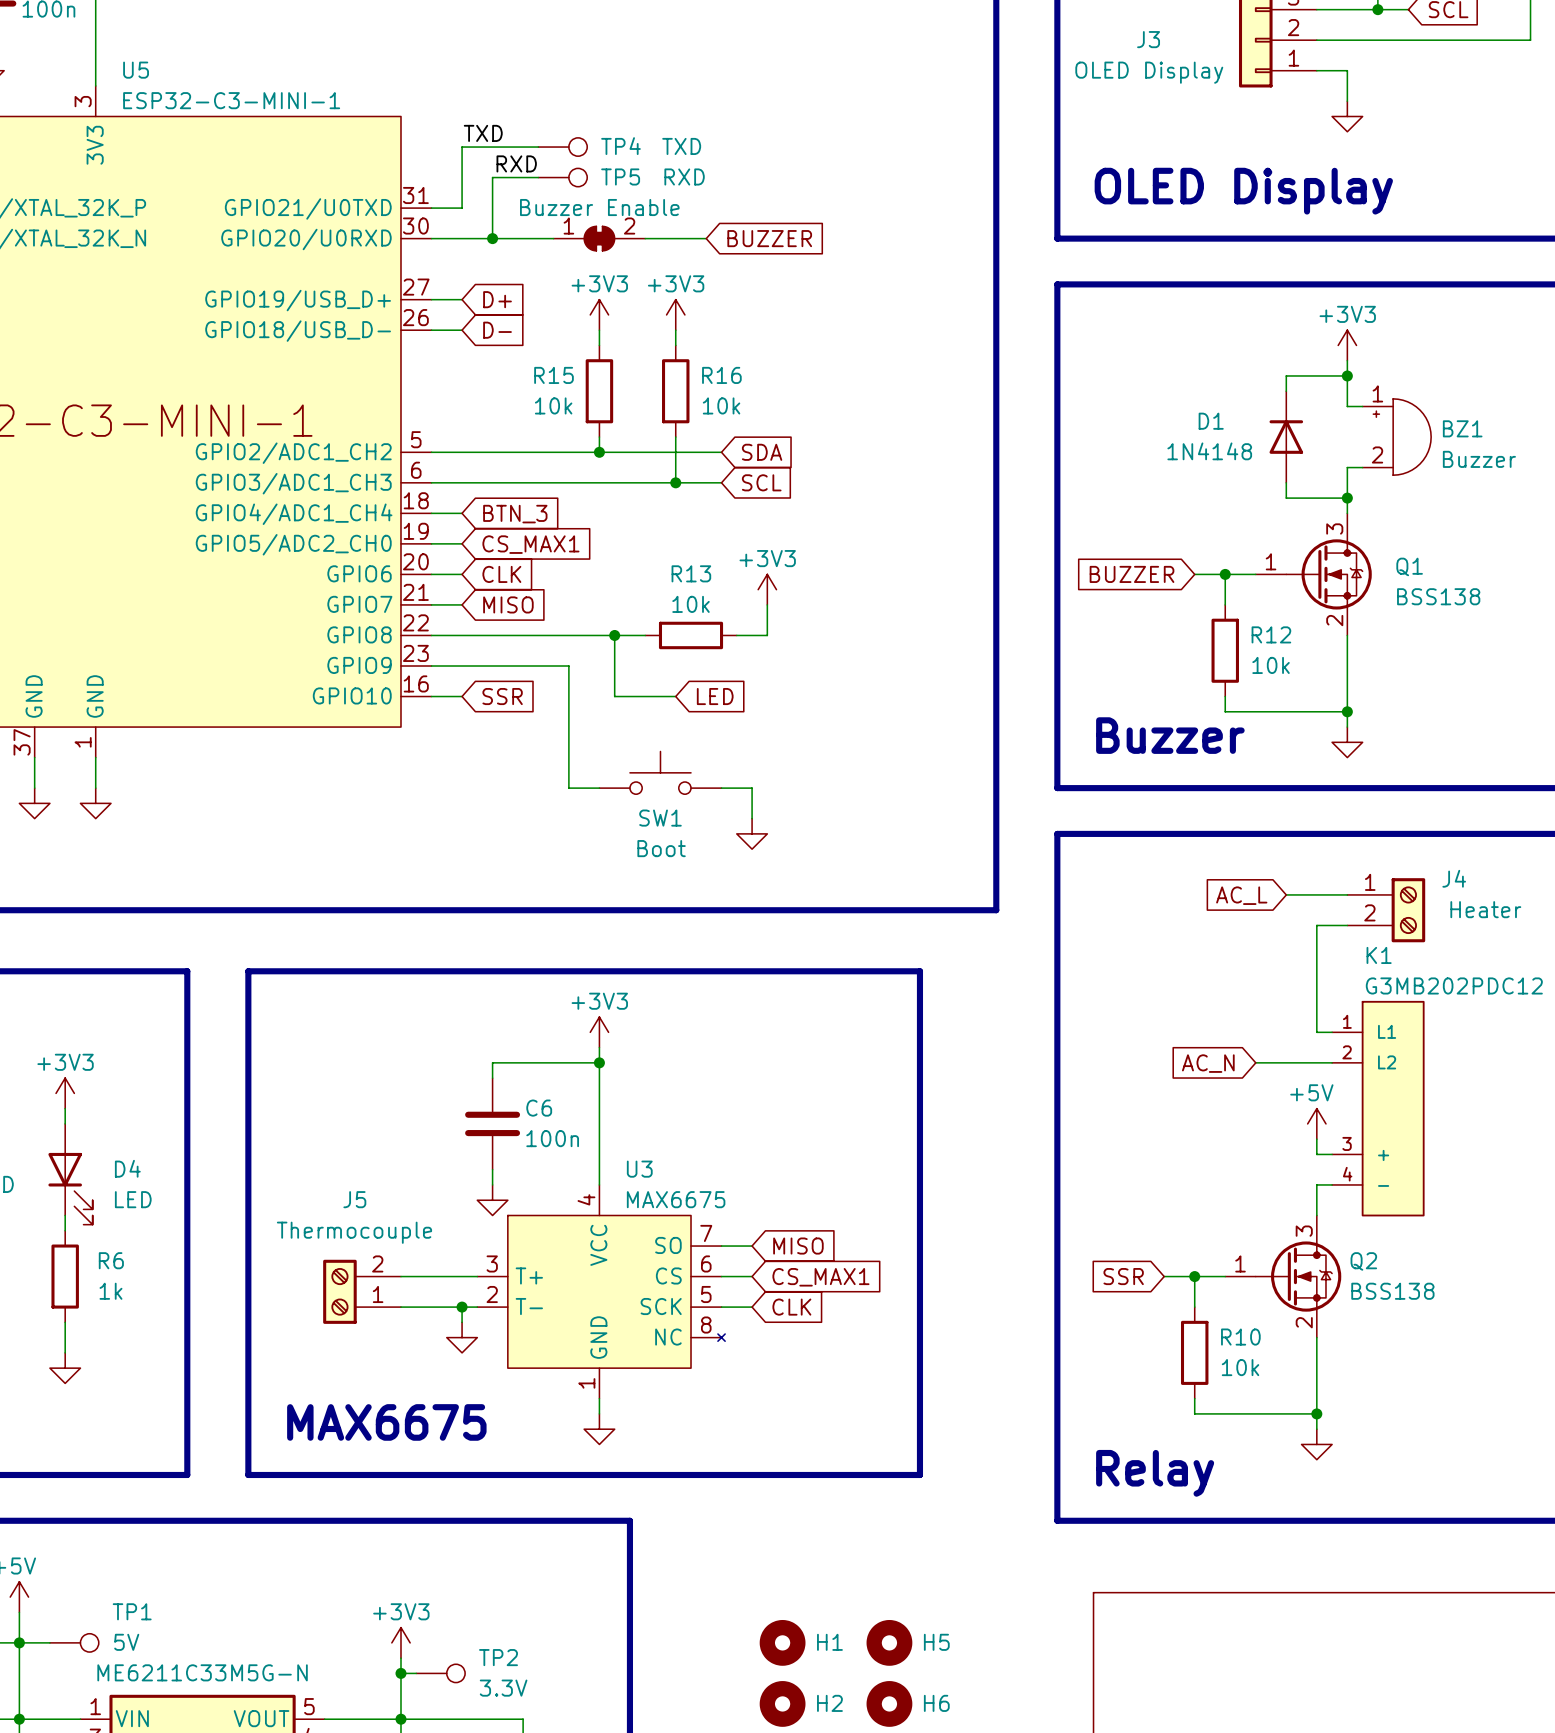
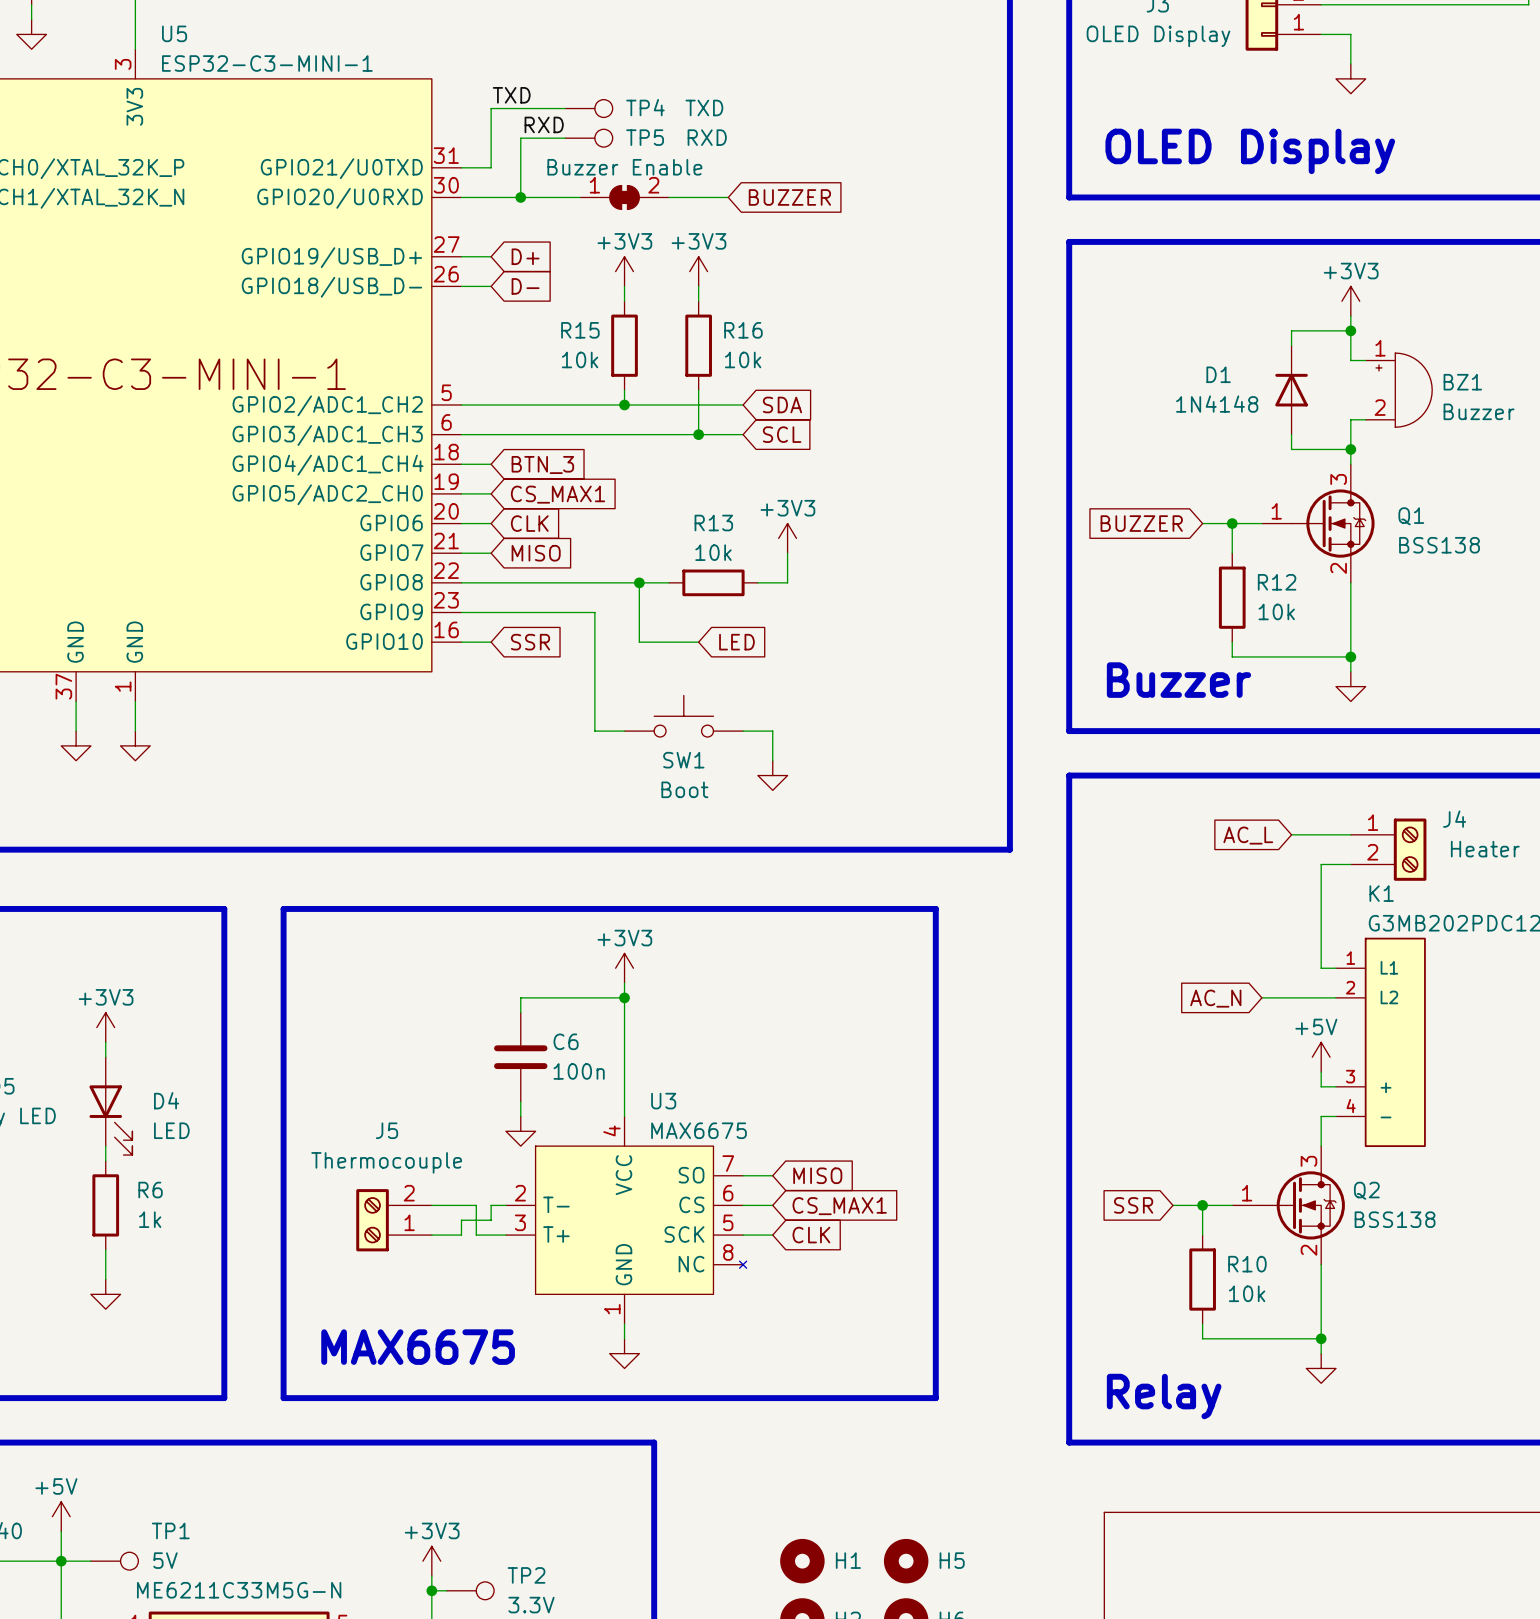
U3 pin number: 3 (492, 1263) -> 2 (520, 1193)
U3 pin name: T+ (529, 1275) -> T- (556, 1204)
wire: (446, 1276) (462, 1276) -> (476, 1205) (476, 1235)
U3 pin number: 2 (492, 1294) -> 3 (520, 1222)
U3 pin name: T- (529, 1306) -> T+ (556, 1234)
wire: (431, 1307) (446, 1307) -> (461, 1235) (461, 1220) (491, 1220) (491, 1205)
wire: (462, 1307) (462, 1322) -> none
junction: (462, 1307) -> none
power symbol: (462, 1337) -> none

